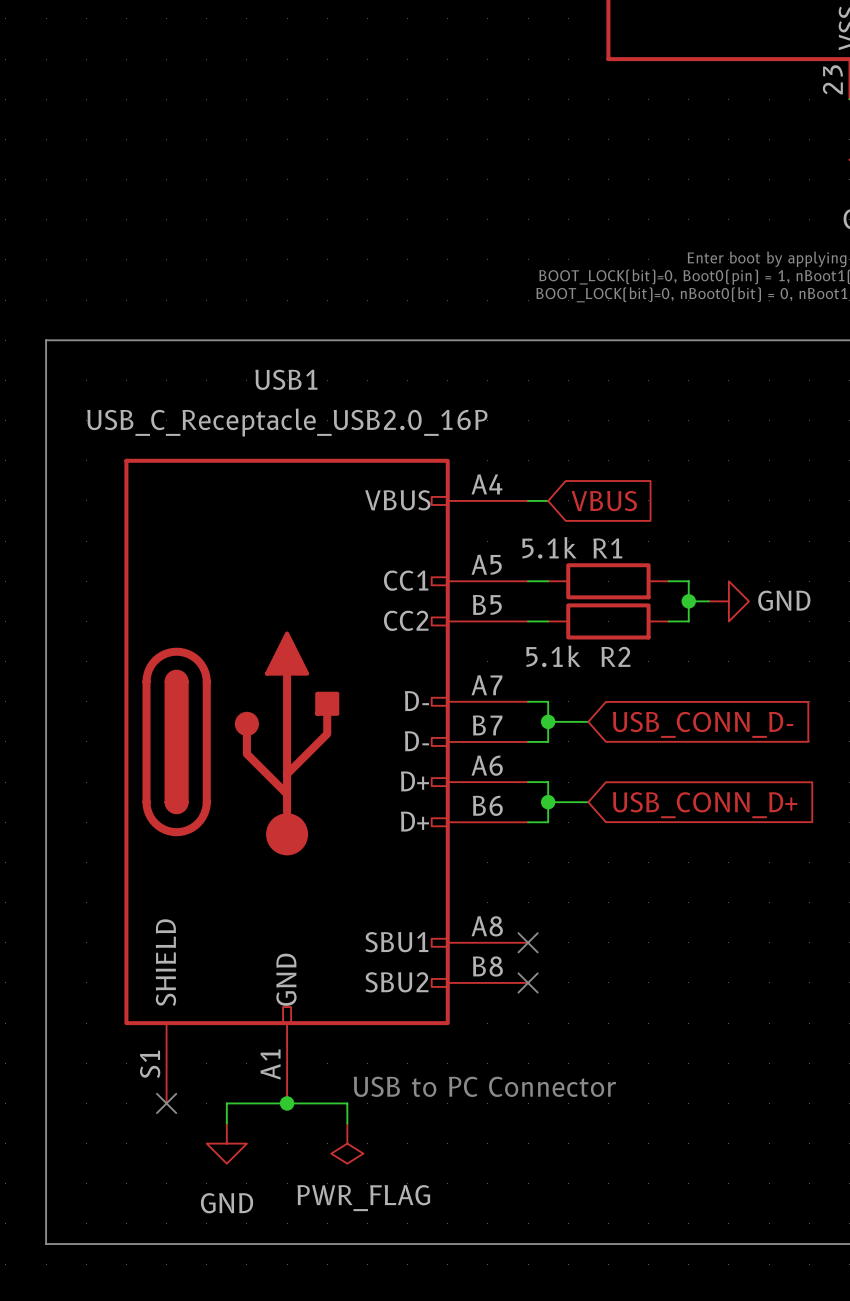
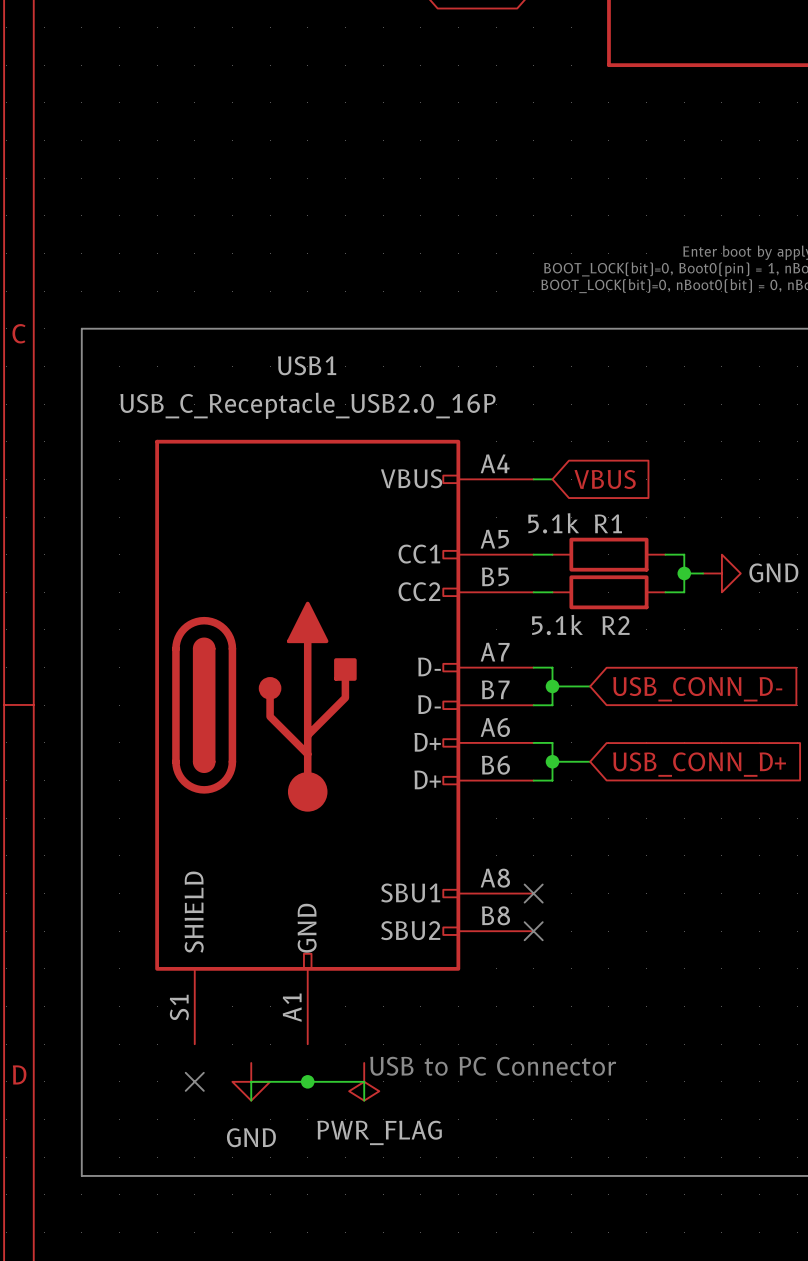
text position: USB to PC Connector (484, 1086) -> USB to PC Connector (493, 1066)
no-connect mark position: (166, 1103) -> (194, 1081)
junction position: (287, 1103) -> (307, 1081)
wire: (226, 1123) (226, 1103) (347, 1103) (347, 1123) -> (251, 1100) (251, 1081) (364, 1081) (364, 1100)

